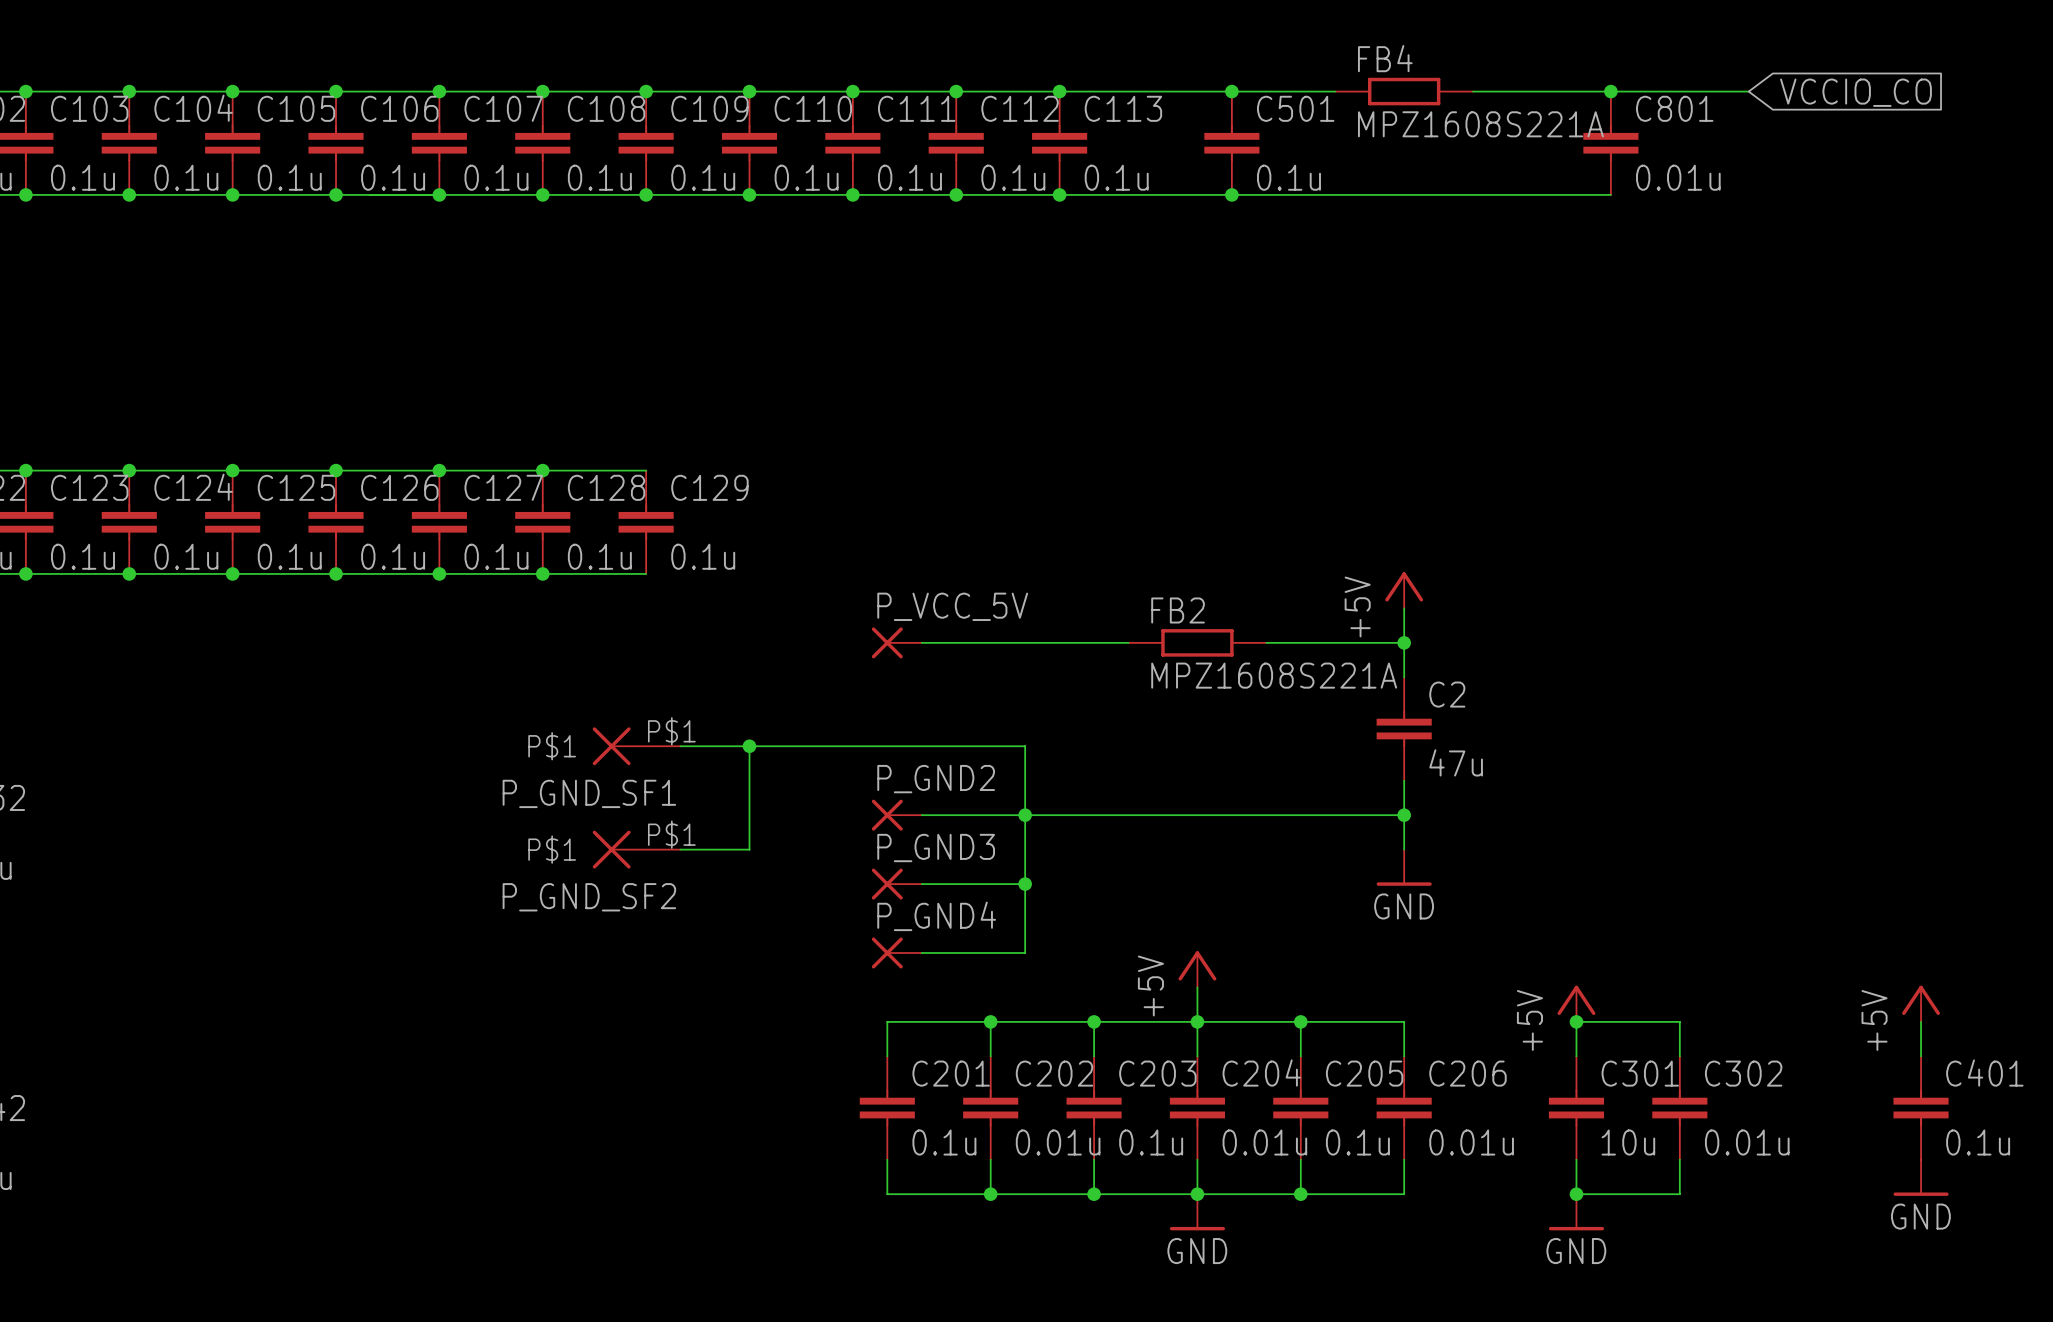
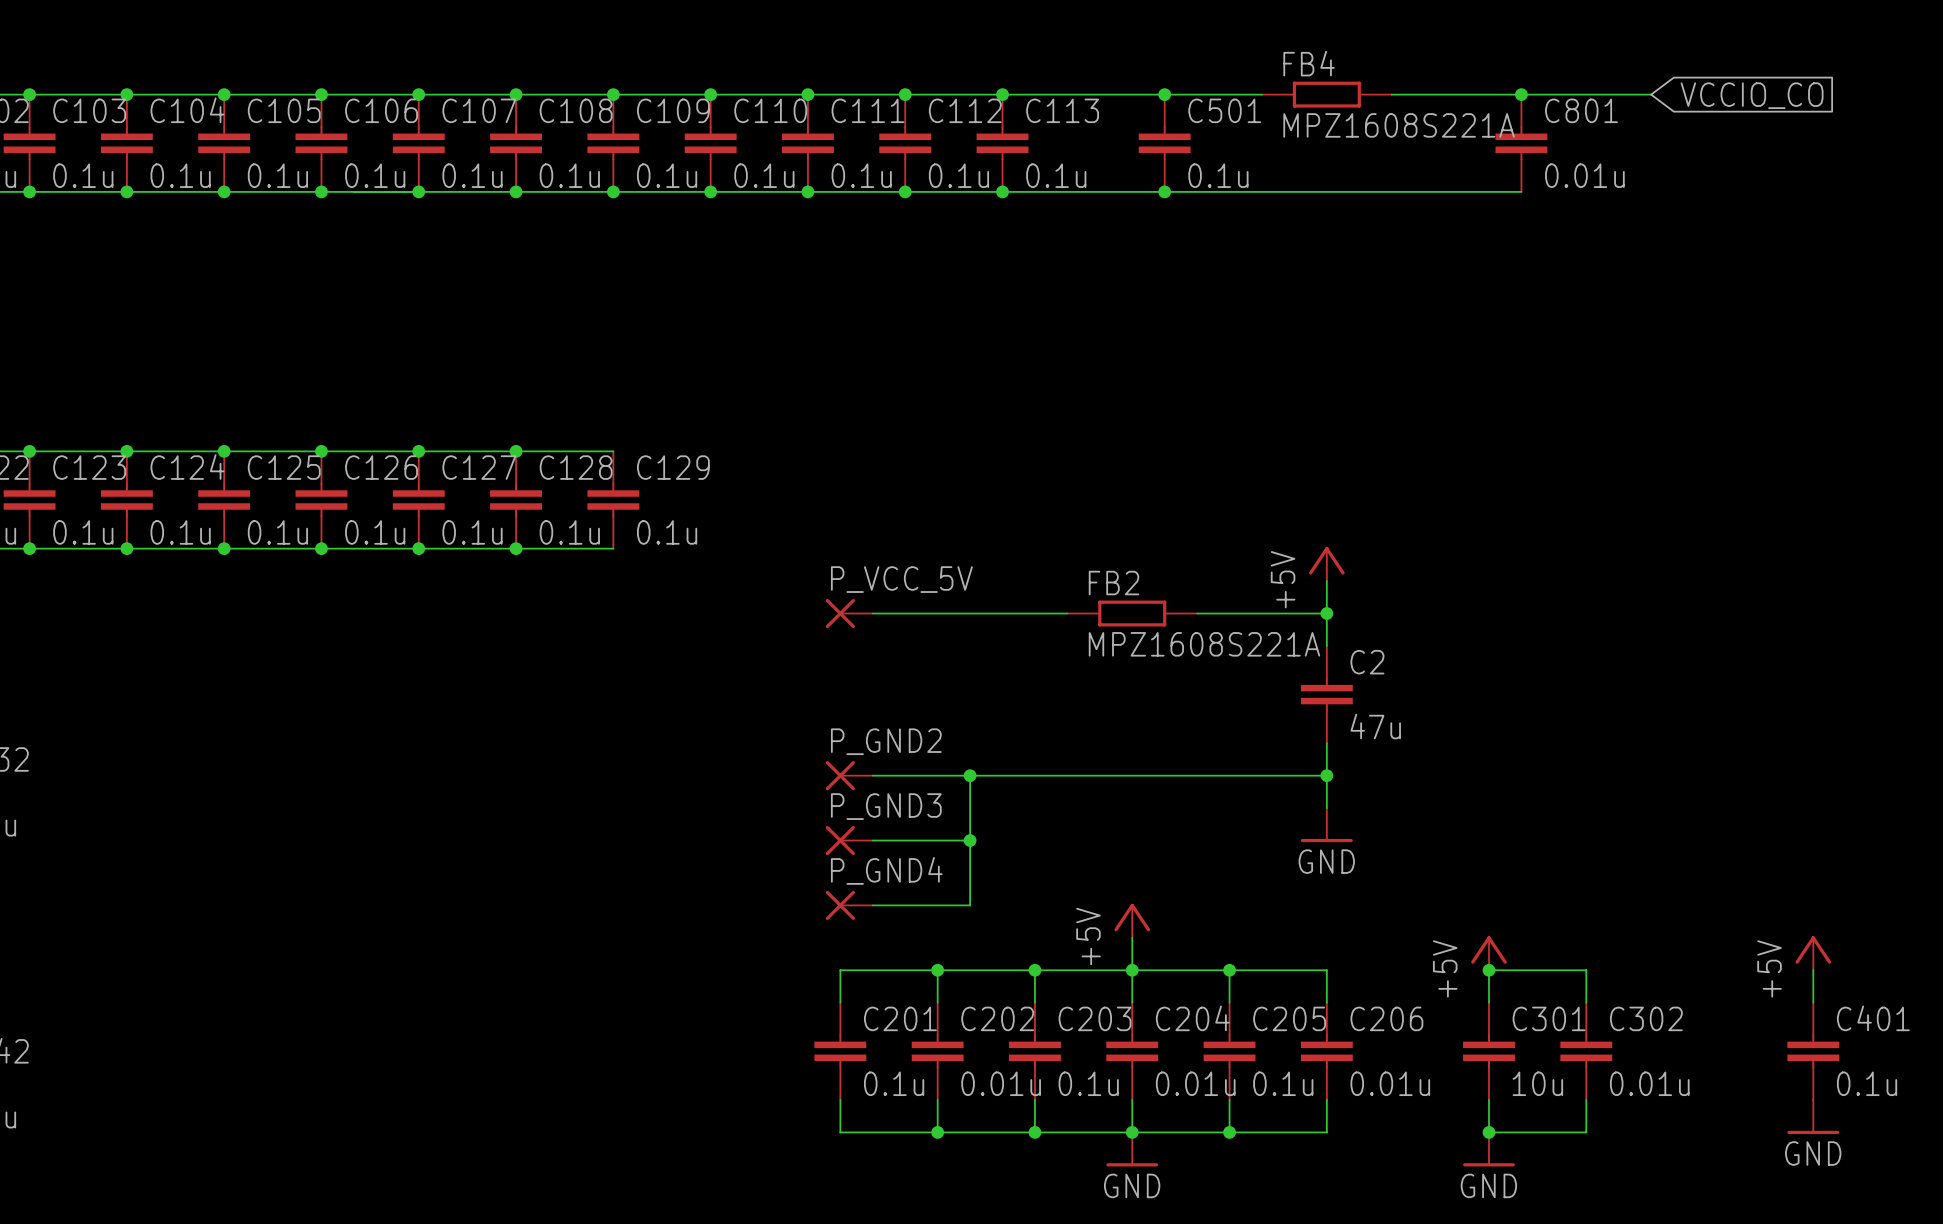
P_GND_SF1: (636, 746) -> none
wire: (680, 746) (1025, 746) (1025, 815) -> none
wire: (749, 746) (749, 849) (680, 849) -> none
junction: (749, 746) -> none
P_GND_SF2: (636, 849) -> none

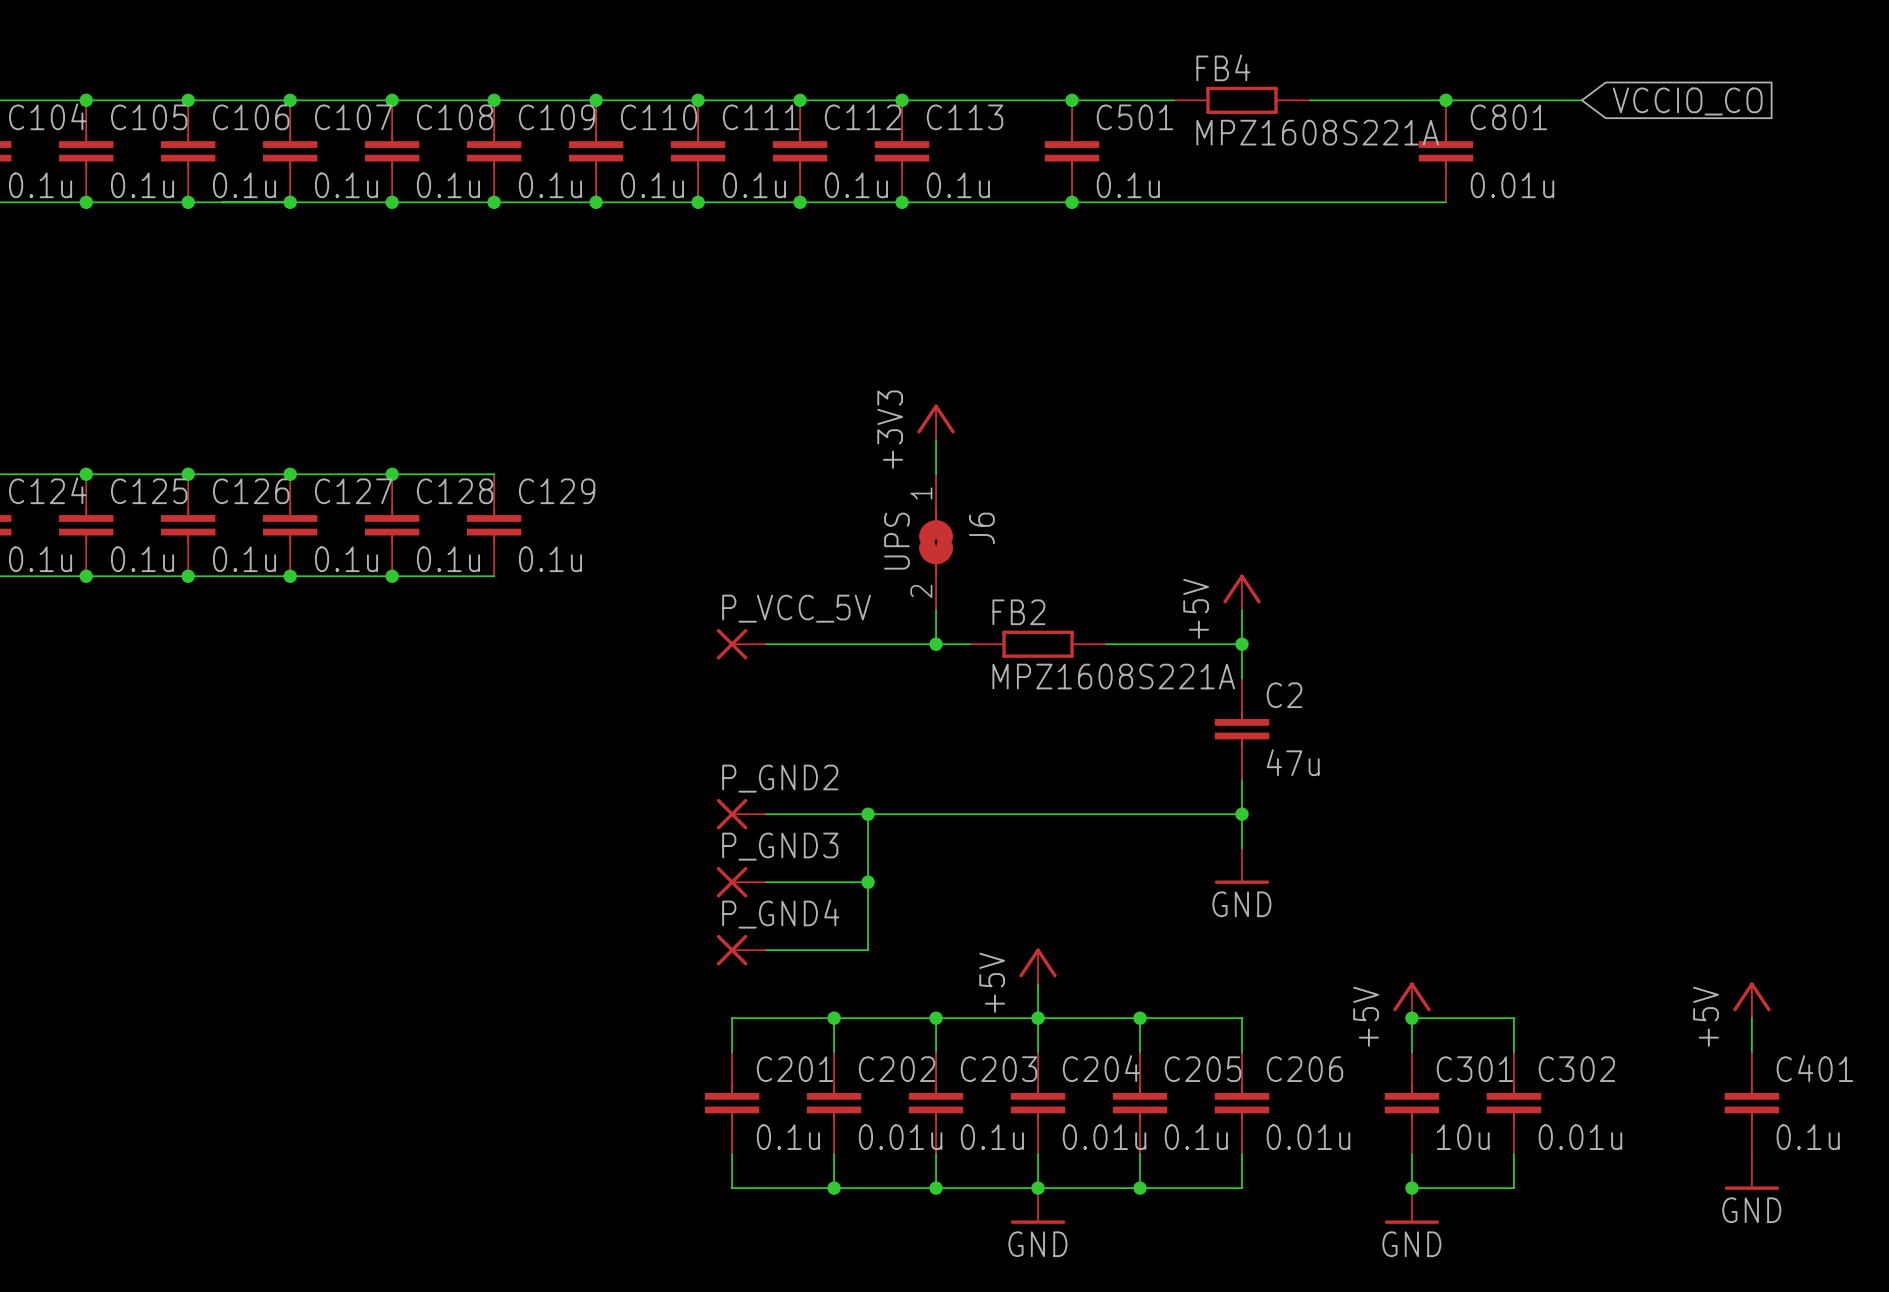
power symbol: none -> +3V3 (936, 422)
wire: none -> (936, 440) (936, 474)
J6: none -> UPS (936, 542)
wire: none -> (936, 610) (936, 644)
junction: none -> (936, 644)

